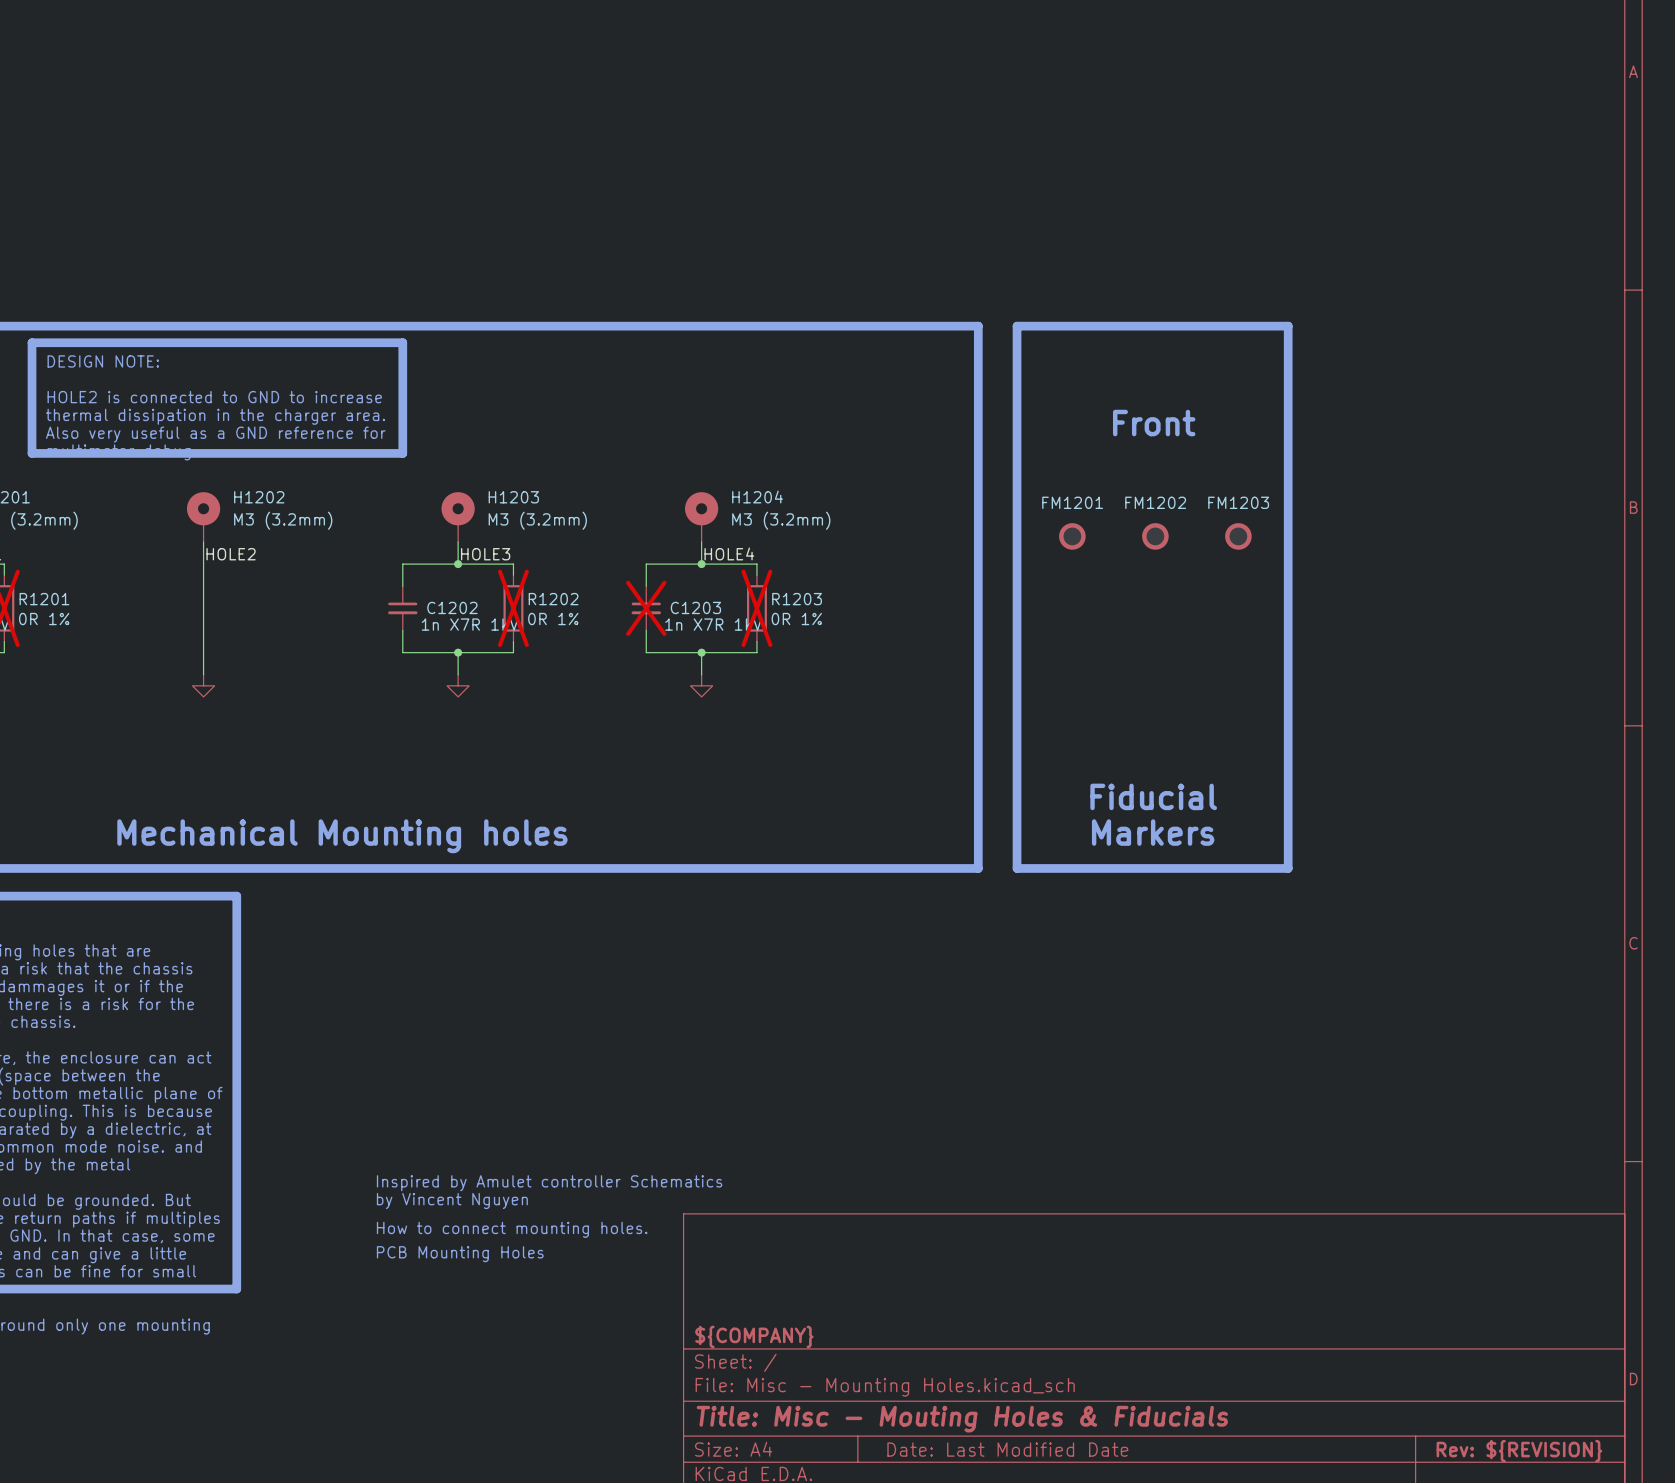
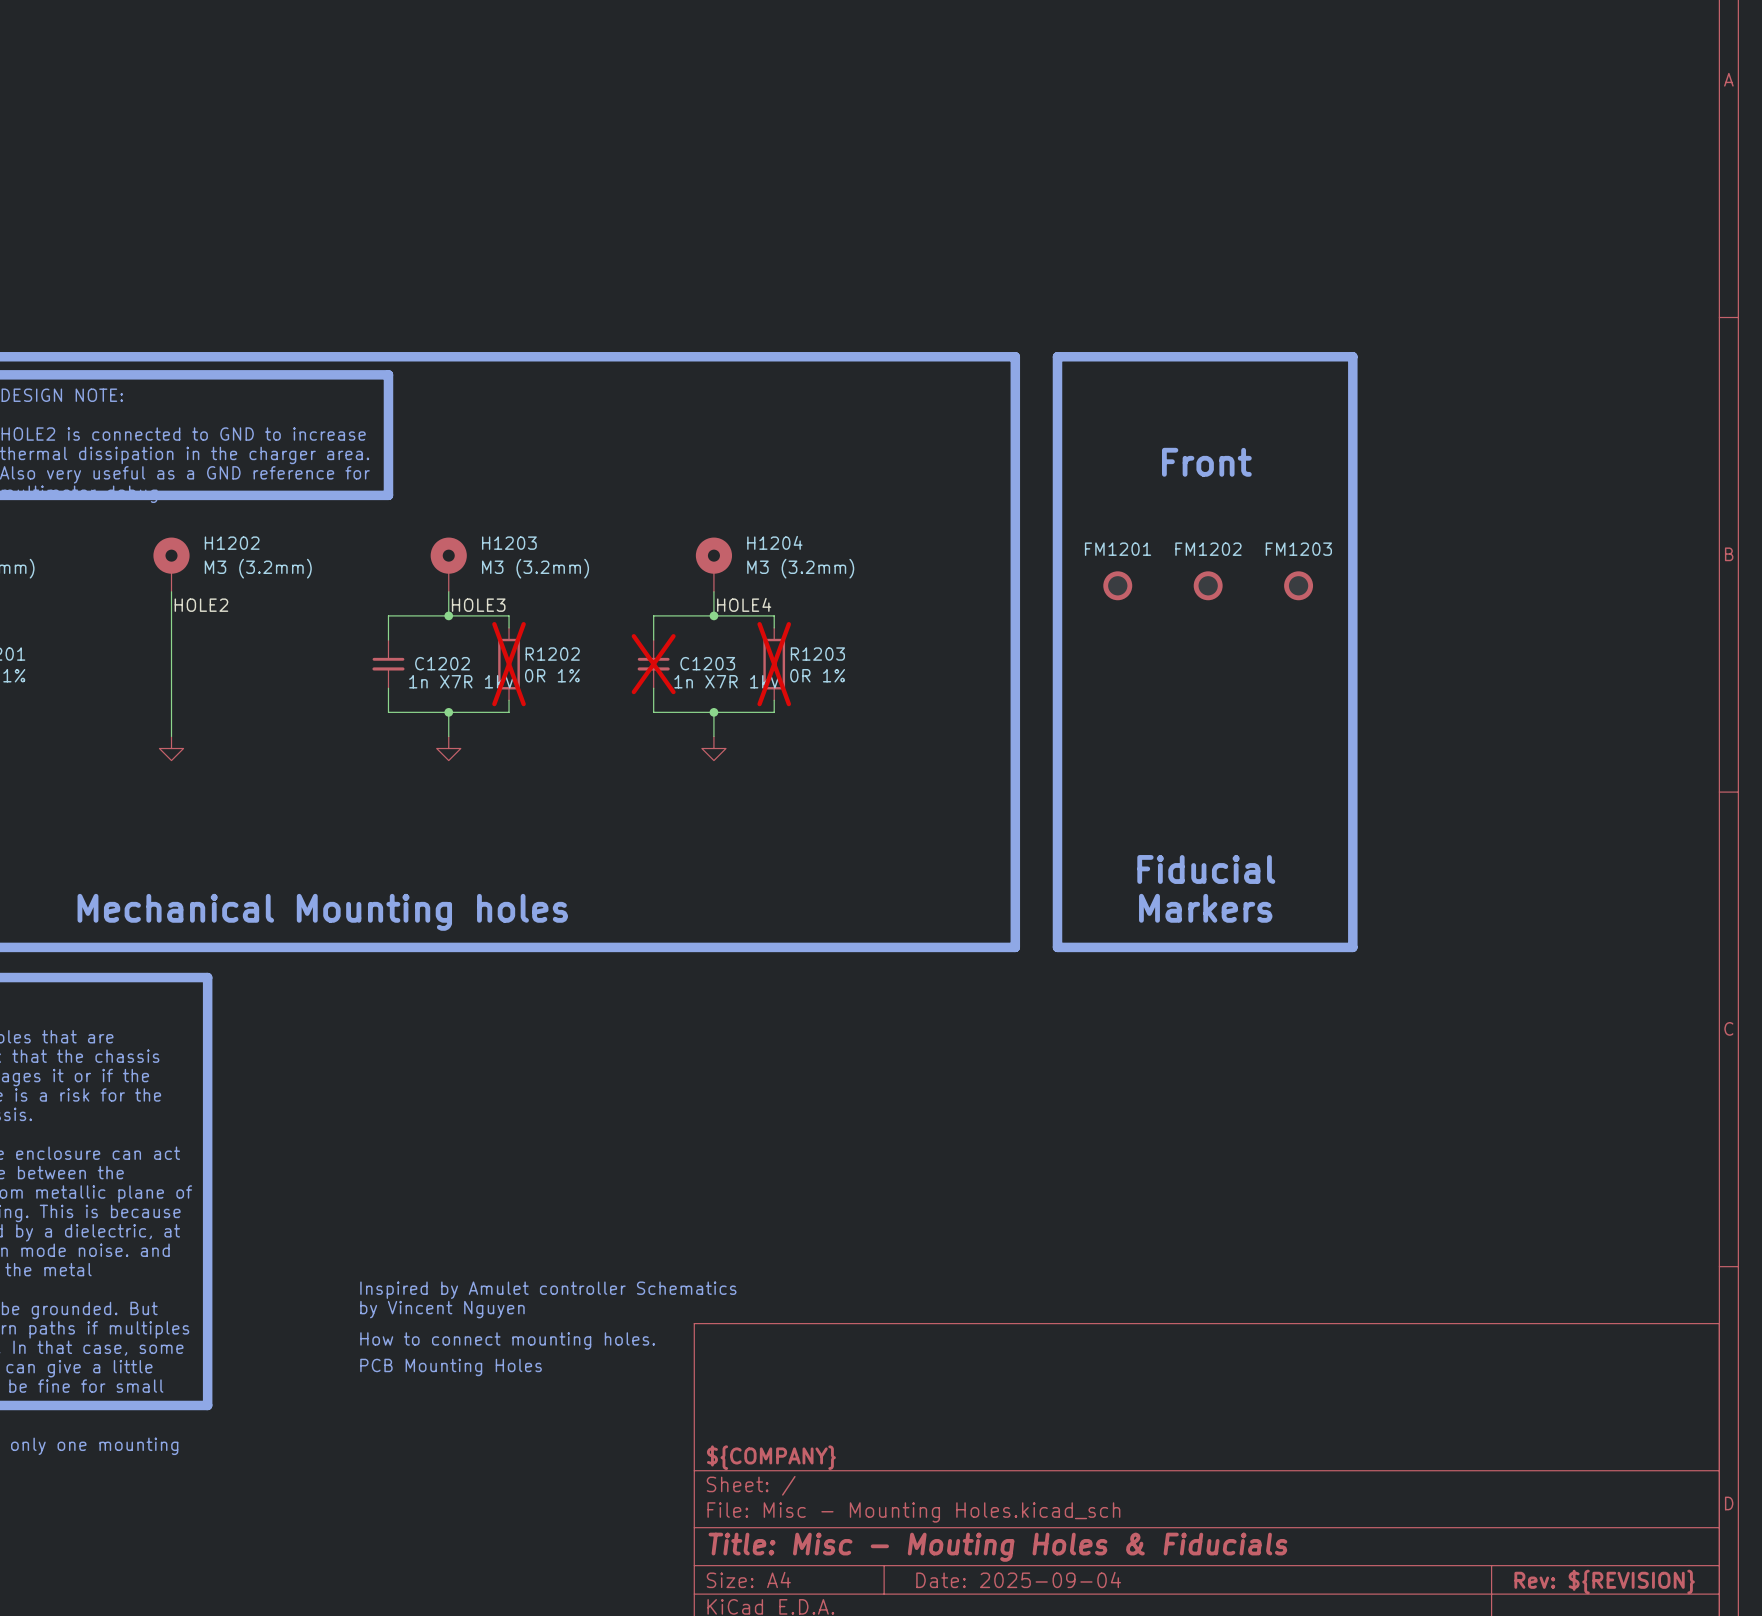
title block: Date: Last Modified Date (1007, 1449) -> Date: 2025-09-04 (1018, 1579)

